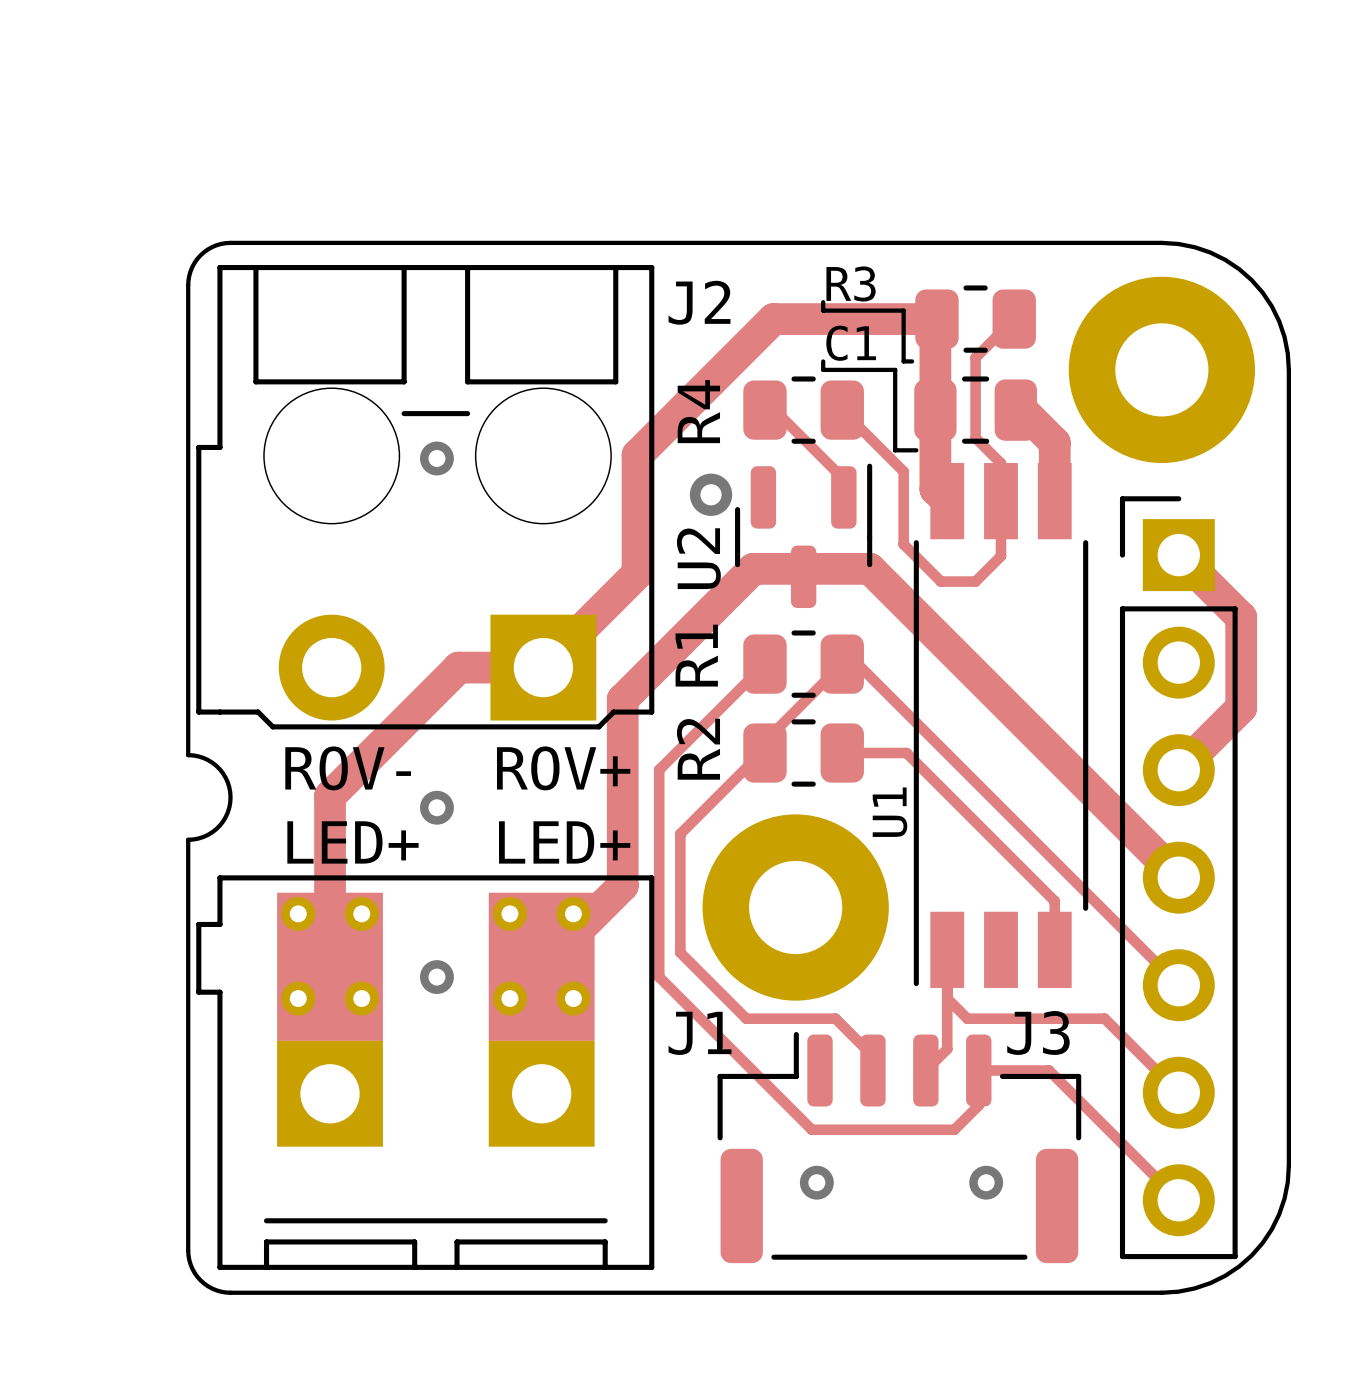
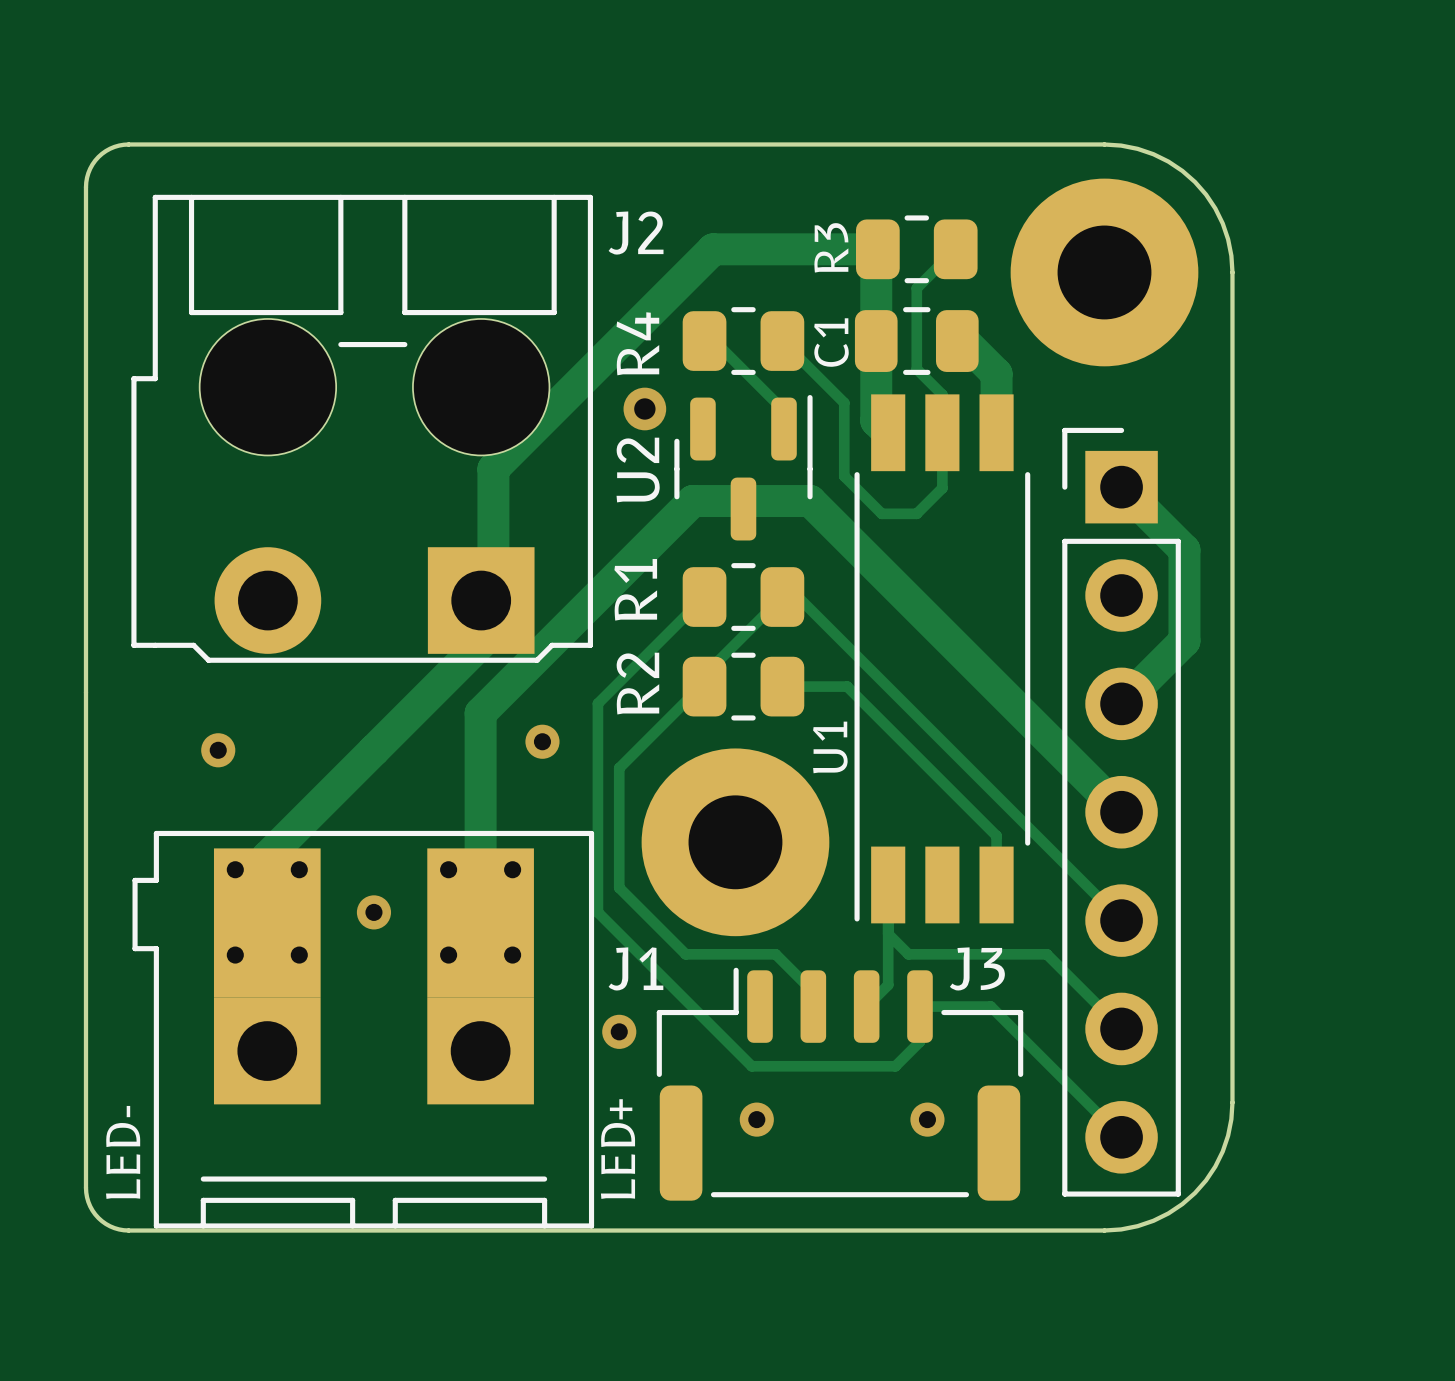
R3 name rotation: 0° (851, 283) -> 90° counterclockwise (831, 247)
line: (823, 302) (823, 310) (903, 310) (903, 361) (912, 361) -> none
C1 name rotation: 0° (851, 343) -> 90° counterclockwise (831, 342)
line: (823, 361) (823, 369) (895, 369) (895, 450) (916, 450) -> none
part position: (1161, 369) -> (1104, 272)
board edge: (1288, 369) (1284, 337) (1279, 321) (1262, 292) (1239, 269) (1225, 259) (1194, 247) (1178, 243) (230, 242) (216, 245) (204, 252) (192, 266) (188, 285) (188, 755) (203, 757) (216, 765) (227, 782) (230, 797) (227, 812) (219, 825) (207, 834) (188, 839) (188, 1250) (190, 1264) (200, 1280) (216, 1290) (230, 1292) -> (1232, 300) (1231, 255) (1228, 239) (1215, 208) (1206, 194) (1182, 170) (1168, 161) (1137, 148) (1121, 145) (128, 144) (114, 146) (102, 153) (90, 168) (85, 187) (86, 1192) (92, 1210) (102, 1221) (110, 1226) (123, 1230) (165, 1230)
track: (637, 455) (637, 573) (543, 667) (458, 667) (330, 796) (330, 966) -> (576, 386) (493, 469) (493, 630) (267, 856) (267, 923)
via: (436, 458) -> none
via position: (711, 494) -> (644, 408)
U2 name position: U2 (698, 558) -> U2 (638, 470)
track: (622, 699) (622, 885) (541, 966) -> (561, 632) (480, 713) (480, 923)
text: ROV- (348, 768) -> none
text: ROV+ (563, 768) -> none
via: (436, 807) -> none
via: none -> (542, 741)
via: none -> (218, 750)
text: LED+ (352, 842) -> none
text: LED+ (564, 842) -> none
J1 position: (425, 1072) -> (363, 1029)
via: none -> (619, 1031)
text: none -> LED+ (617, 1149)
text: none -> LED- (123, 1152)

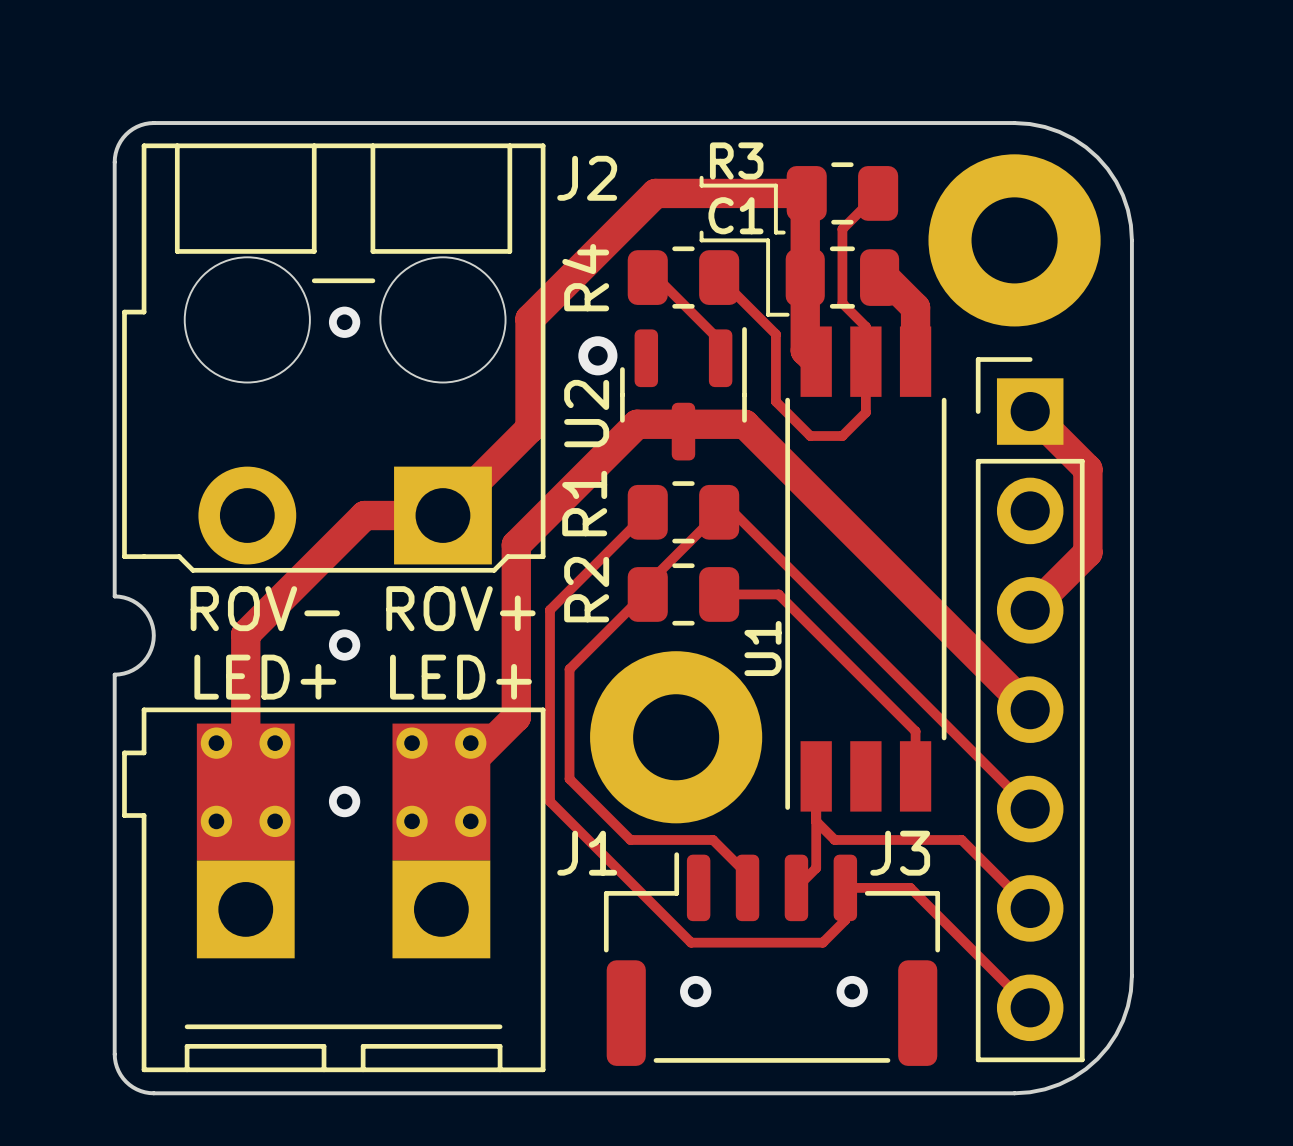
line: none -> (701, 177) (701, 185) (775, 185) (775, 232) (783, 232)
R3 name rotation: 0° (831, 247) -> 90° clockwise (736, 160)
part position: (1104, 272) -> (1014, 240)
line: none -> (701, 232) (701, 240) (768, 240) (768, 314) (787, 314)
board edge: (1232, 300) (1231, 255) (1228, 239) (1215, 208) (1206, 194) (1182, 170) (1168, 161) (1137, 148) (1121, 145) (128, 144) (114, 146) (102, 153) (90, 168) (85, 187) (86, 1192) (92, 1210) (102, 1221) (110, 1226) (123, 1230) (165, 1230) -> (1131, 240) (1127, 210) (1123, 195) (1107, 168) (1086, 147) (1073, 138) (1044, 127) (1029, 124) (153, 123) (140, 125) (129, 131) (118, 145) (114, 162) (114, 596) (128, 598) (140, 606) (151, 621) (153, 635) (151, 649) (143, 661) (132, 670) (114, 674) (114, 1054) (116, 1067) (126, 1081) (140, 1091) (153, 1093)
C1 name rotation: 0° (831, 342) -> 90° clockwise (735, 215)
track: (576, 386) (493, 469) (493, 630) (267, 856) (267, 923) -> (529, 319) (529, 428) (442, 515) (364, 515) (245, 634) (245, 792)
via: none -> (344, 322)
via position: (644, 408) -> (597, 355)
U2 name position: U2 (638, 470) -> U2 (586, 413)
track: (561, 632) (480, 713) (480, 923) -> (516, 544) (516, 717) (441, 792)
text: none -> ROV- (265, 608)
text: none -> ROV+ (460, 608)
via: none -> (344, 645)
via: (542, 741) -> none
via: (218, 750) -> none
text: none -> LED+ (265, 677)
text: none -> LED+ (460, 677)
J1 position: (363, 1029) -> (333, 889)
via: (619, 1031) -> none
text: LED+ (617, 1149) -> none
text: LED- (123, 1152) -> none

